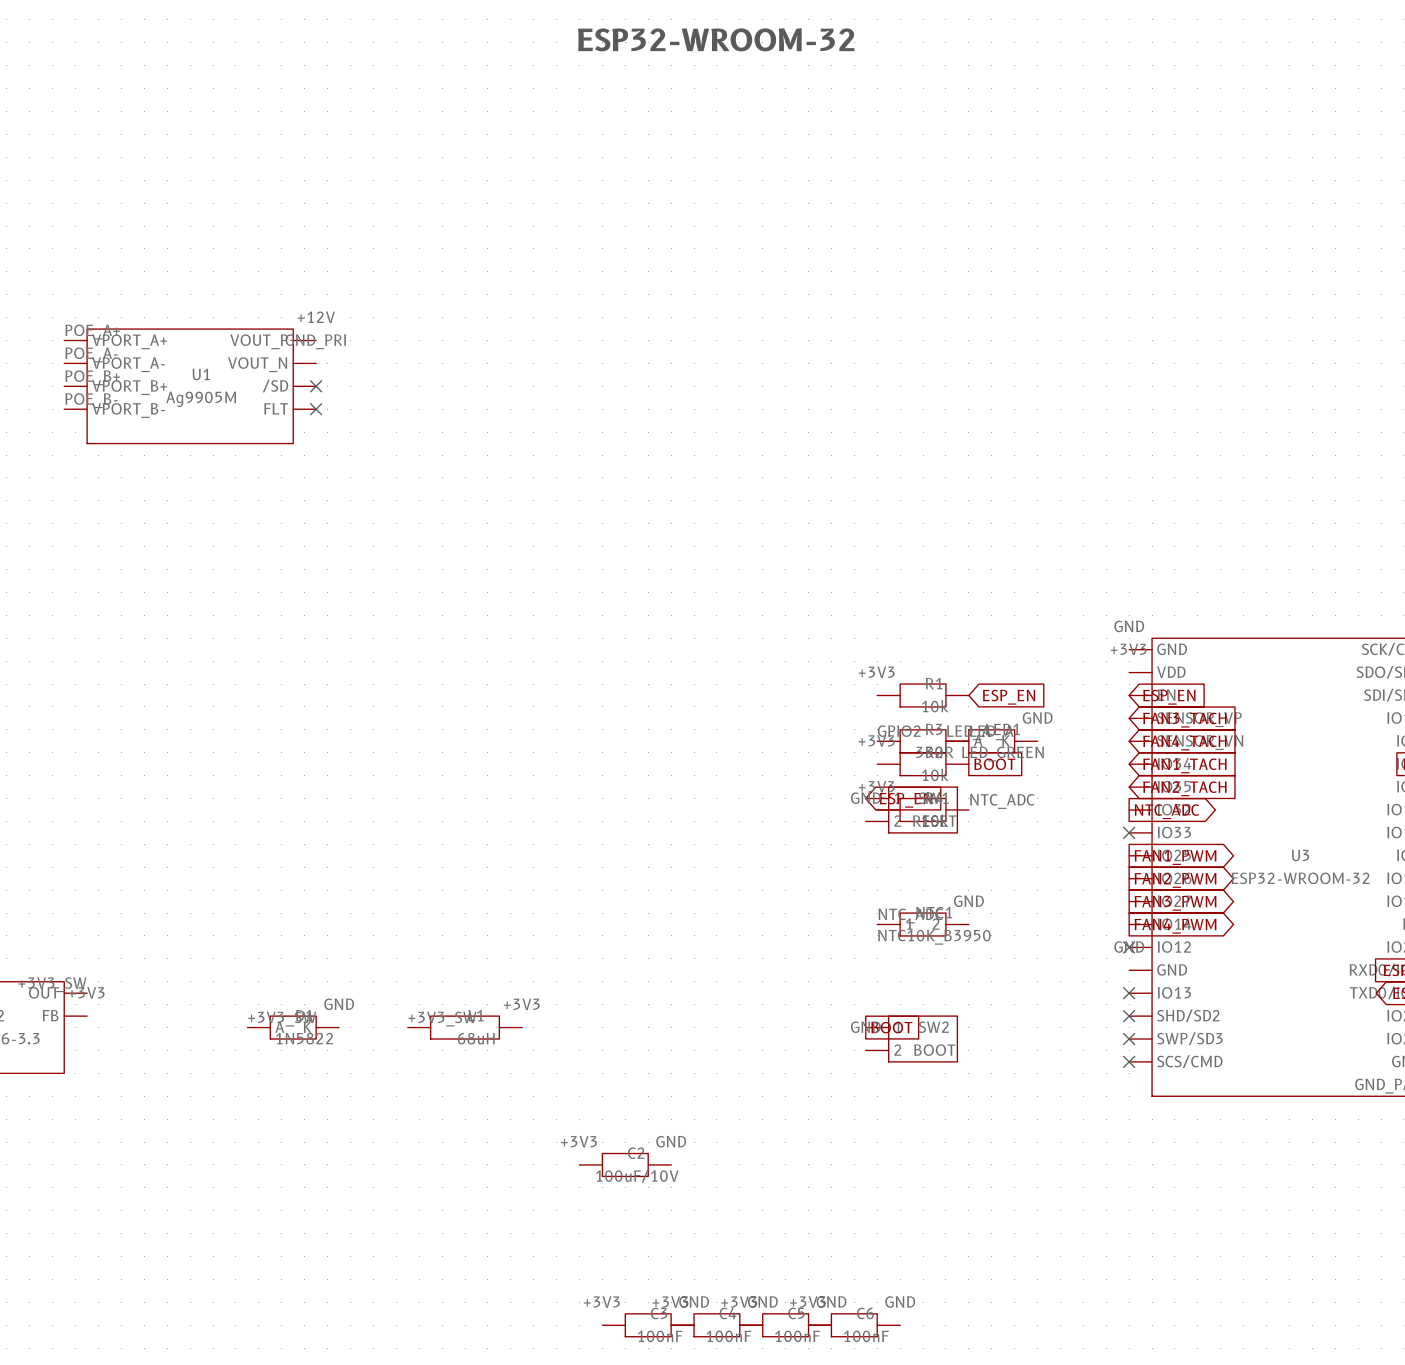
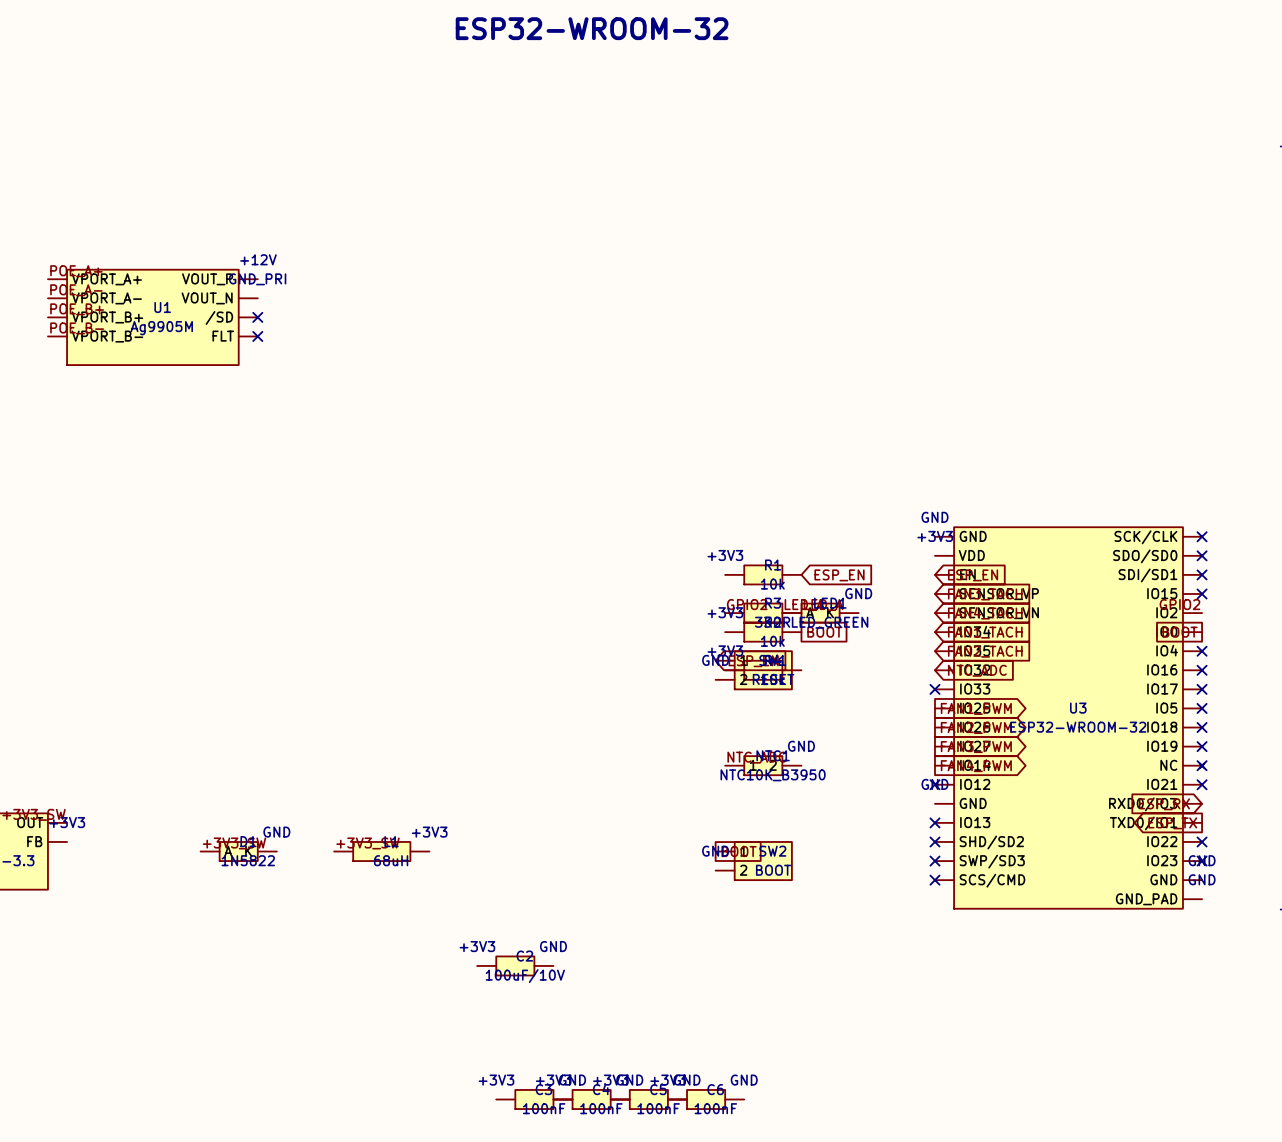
label: NTC_ADC (1002, 801) -> none
global label shape: output (1166, 811) -> input (977, 670)

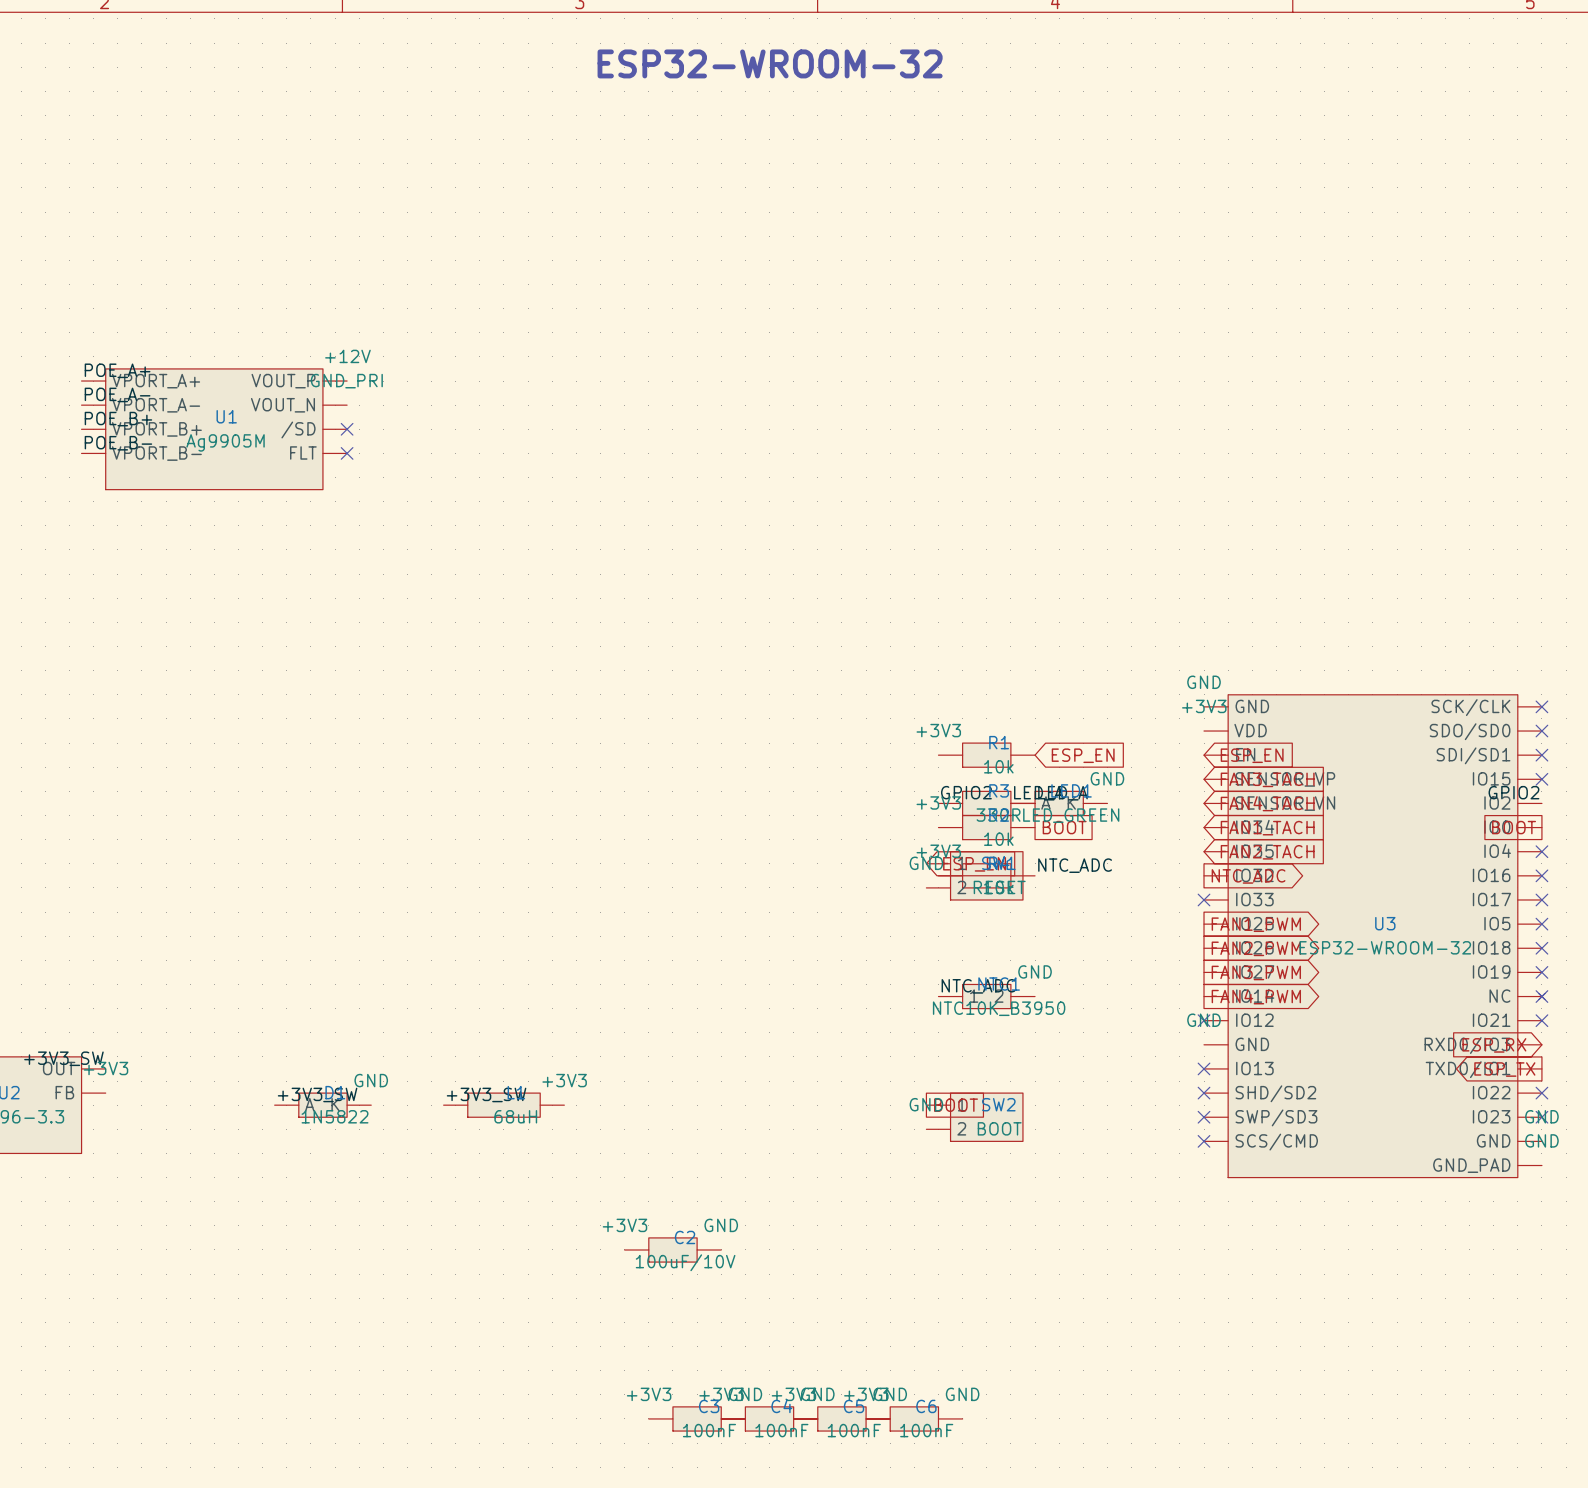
label: none -> NTC_ADC (1075, 865)
global label shape: input (977, 670) -> output (1248, 876)

